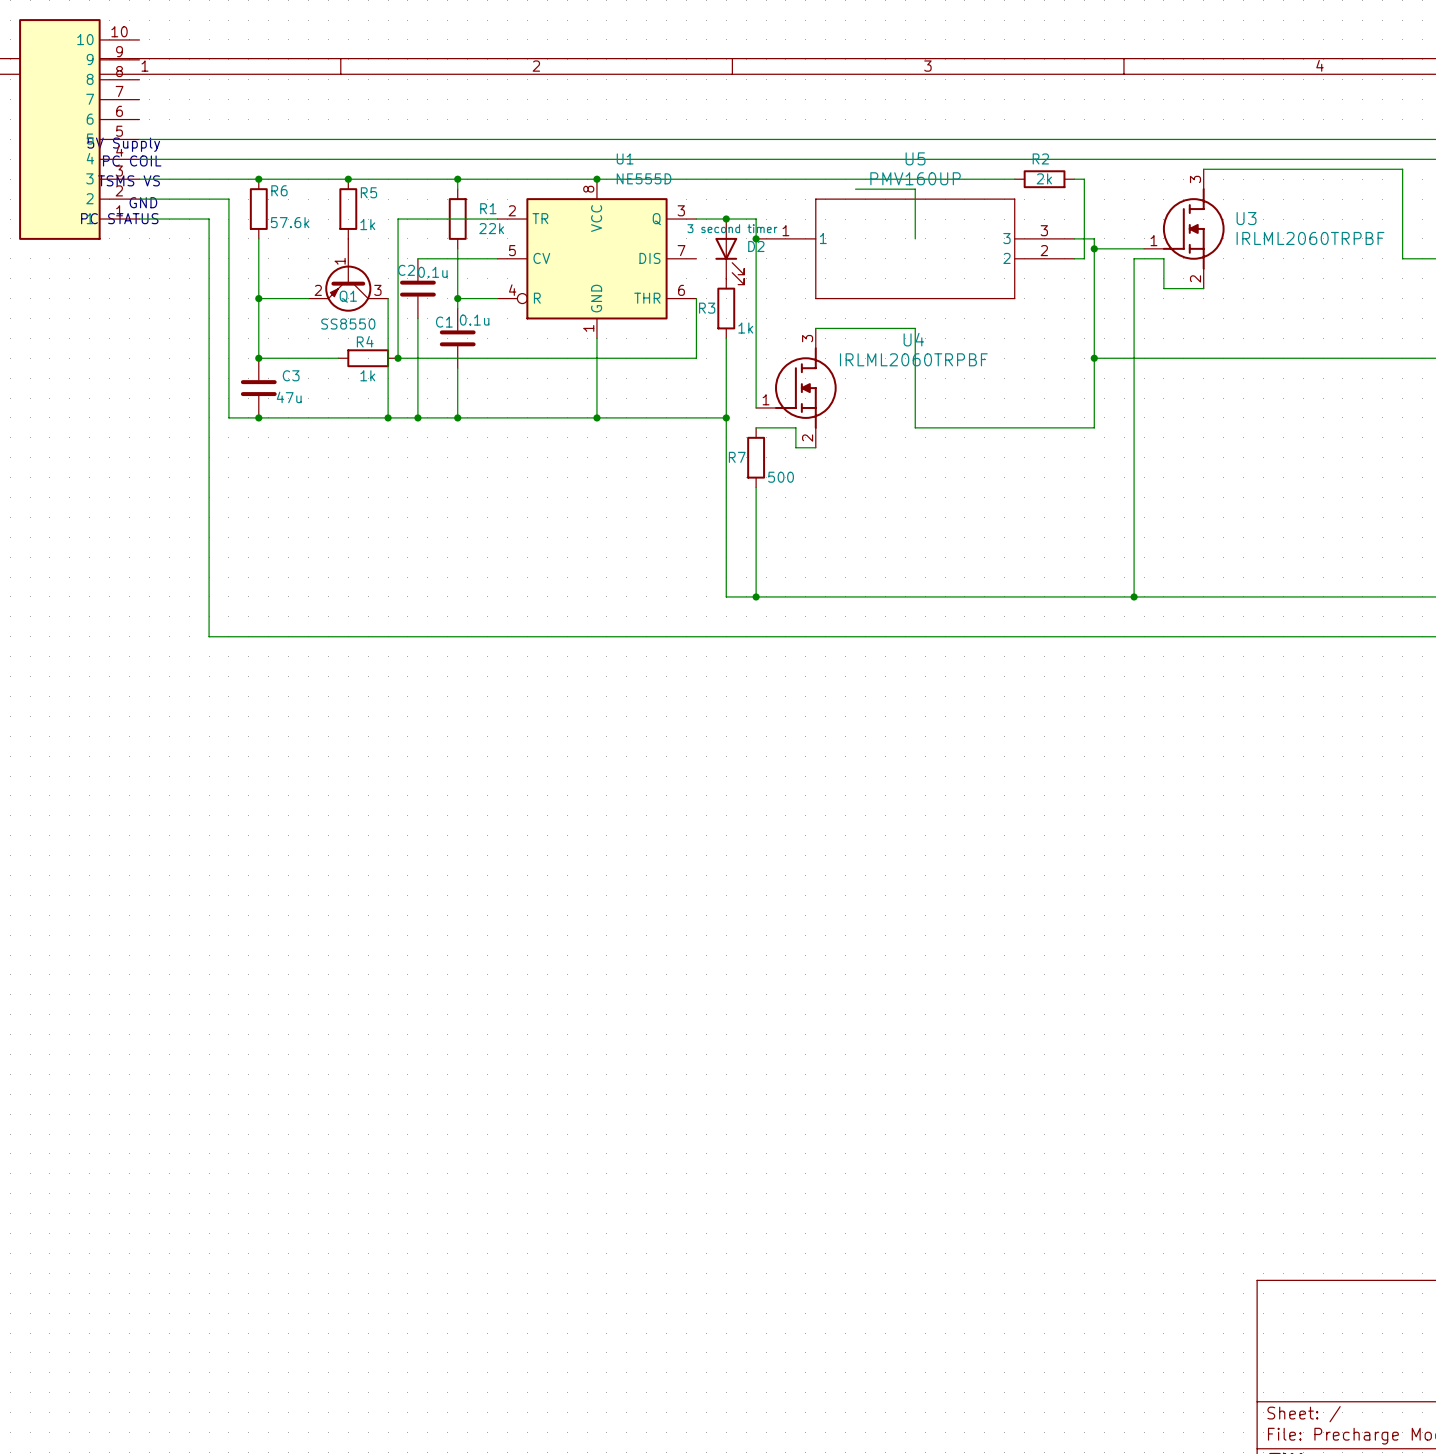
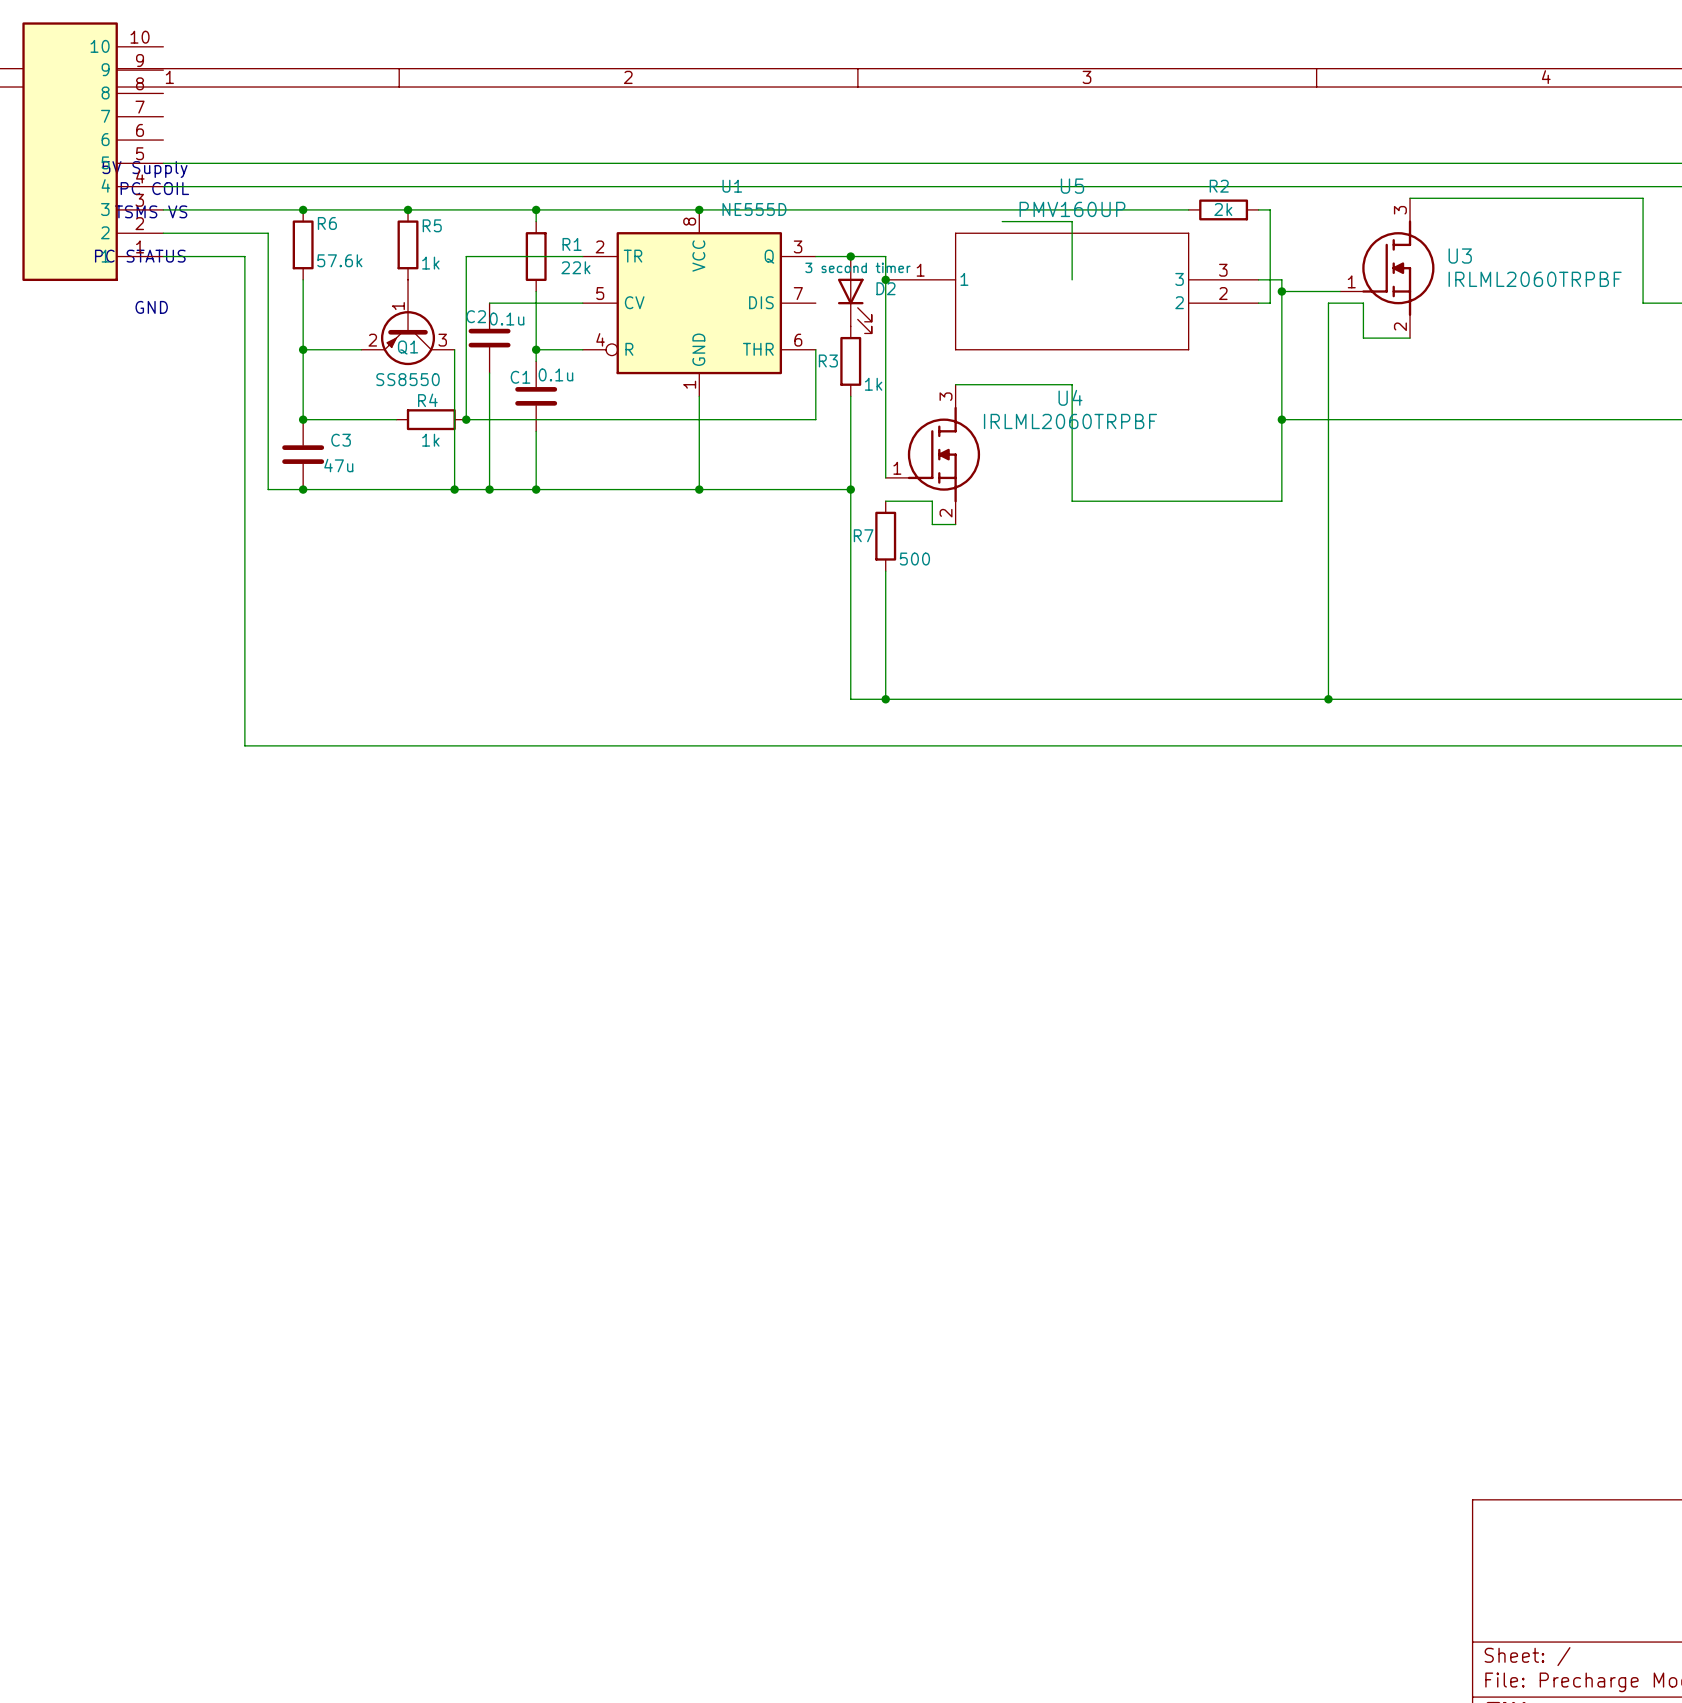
text position: GND (143, 202) -> GND (151, 307)

